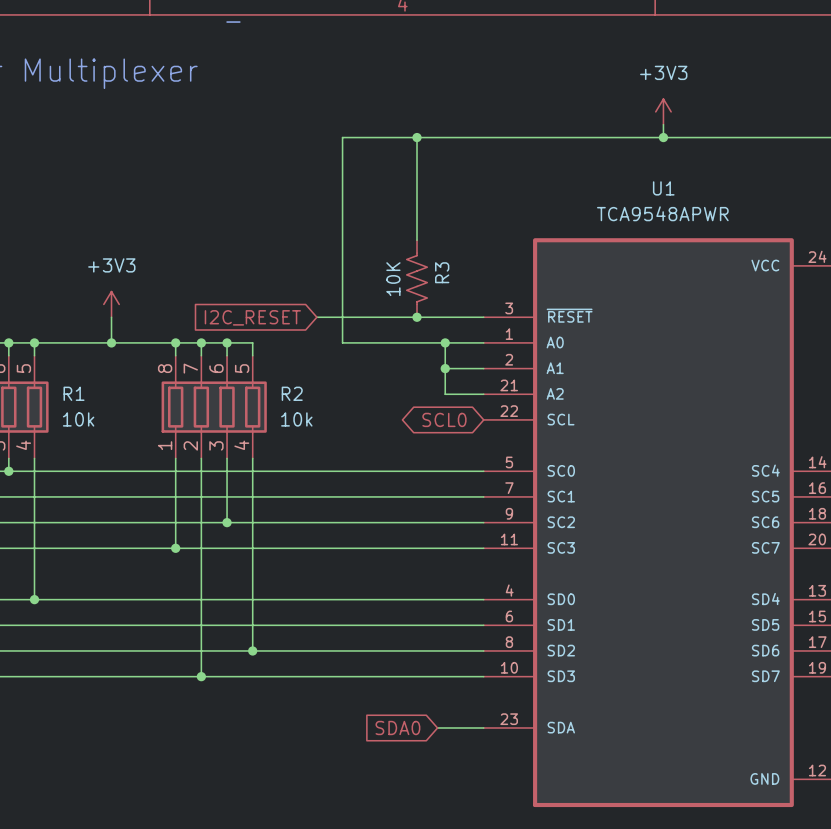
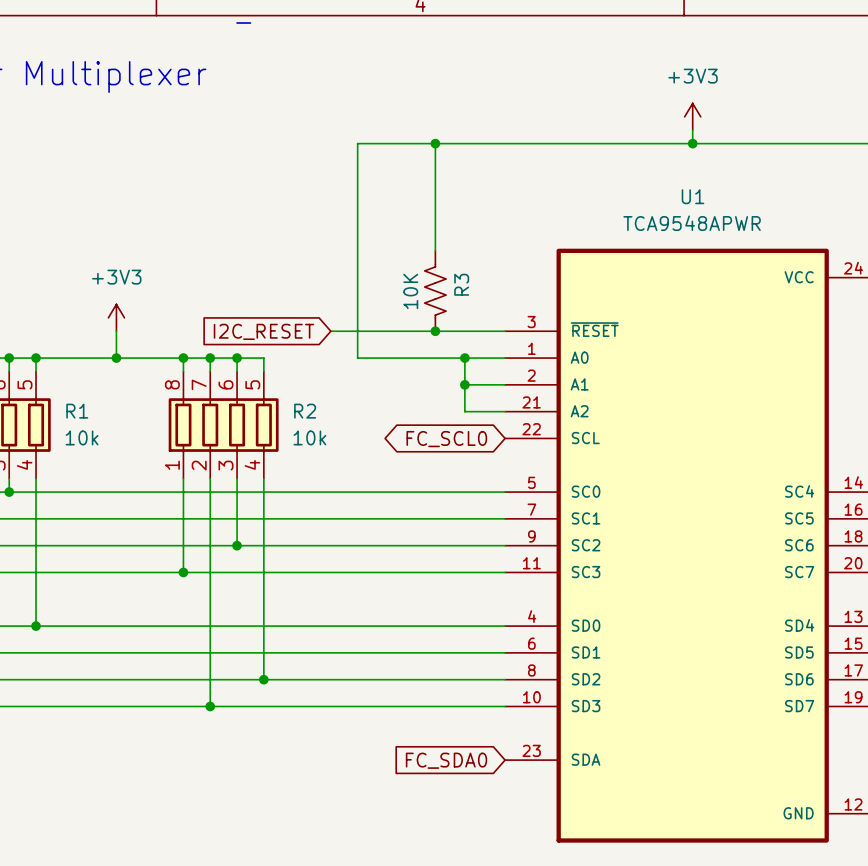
global label: SCL0 (444, 419) -> FC_SCL0 (446, 439)
global label: SDA0 (397, 727) -> FC_SDA0 (446, 760)
wire: (437, 727) (483, 727) -> none

